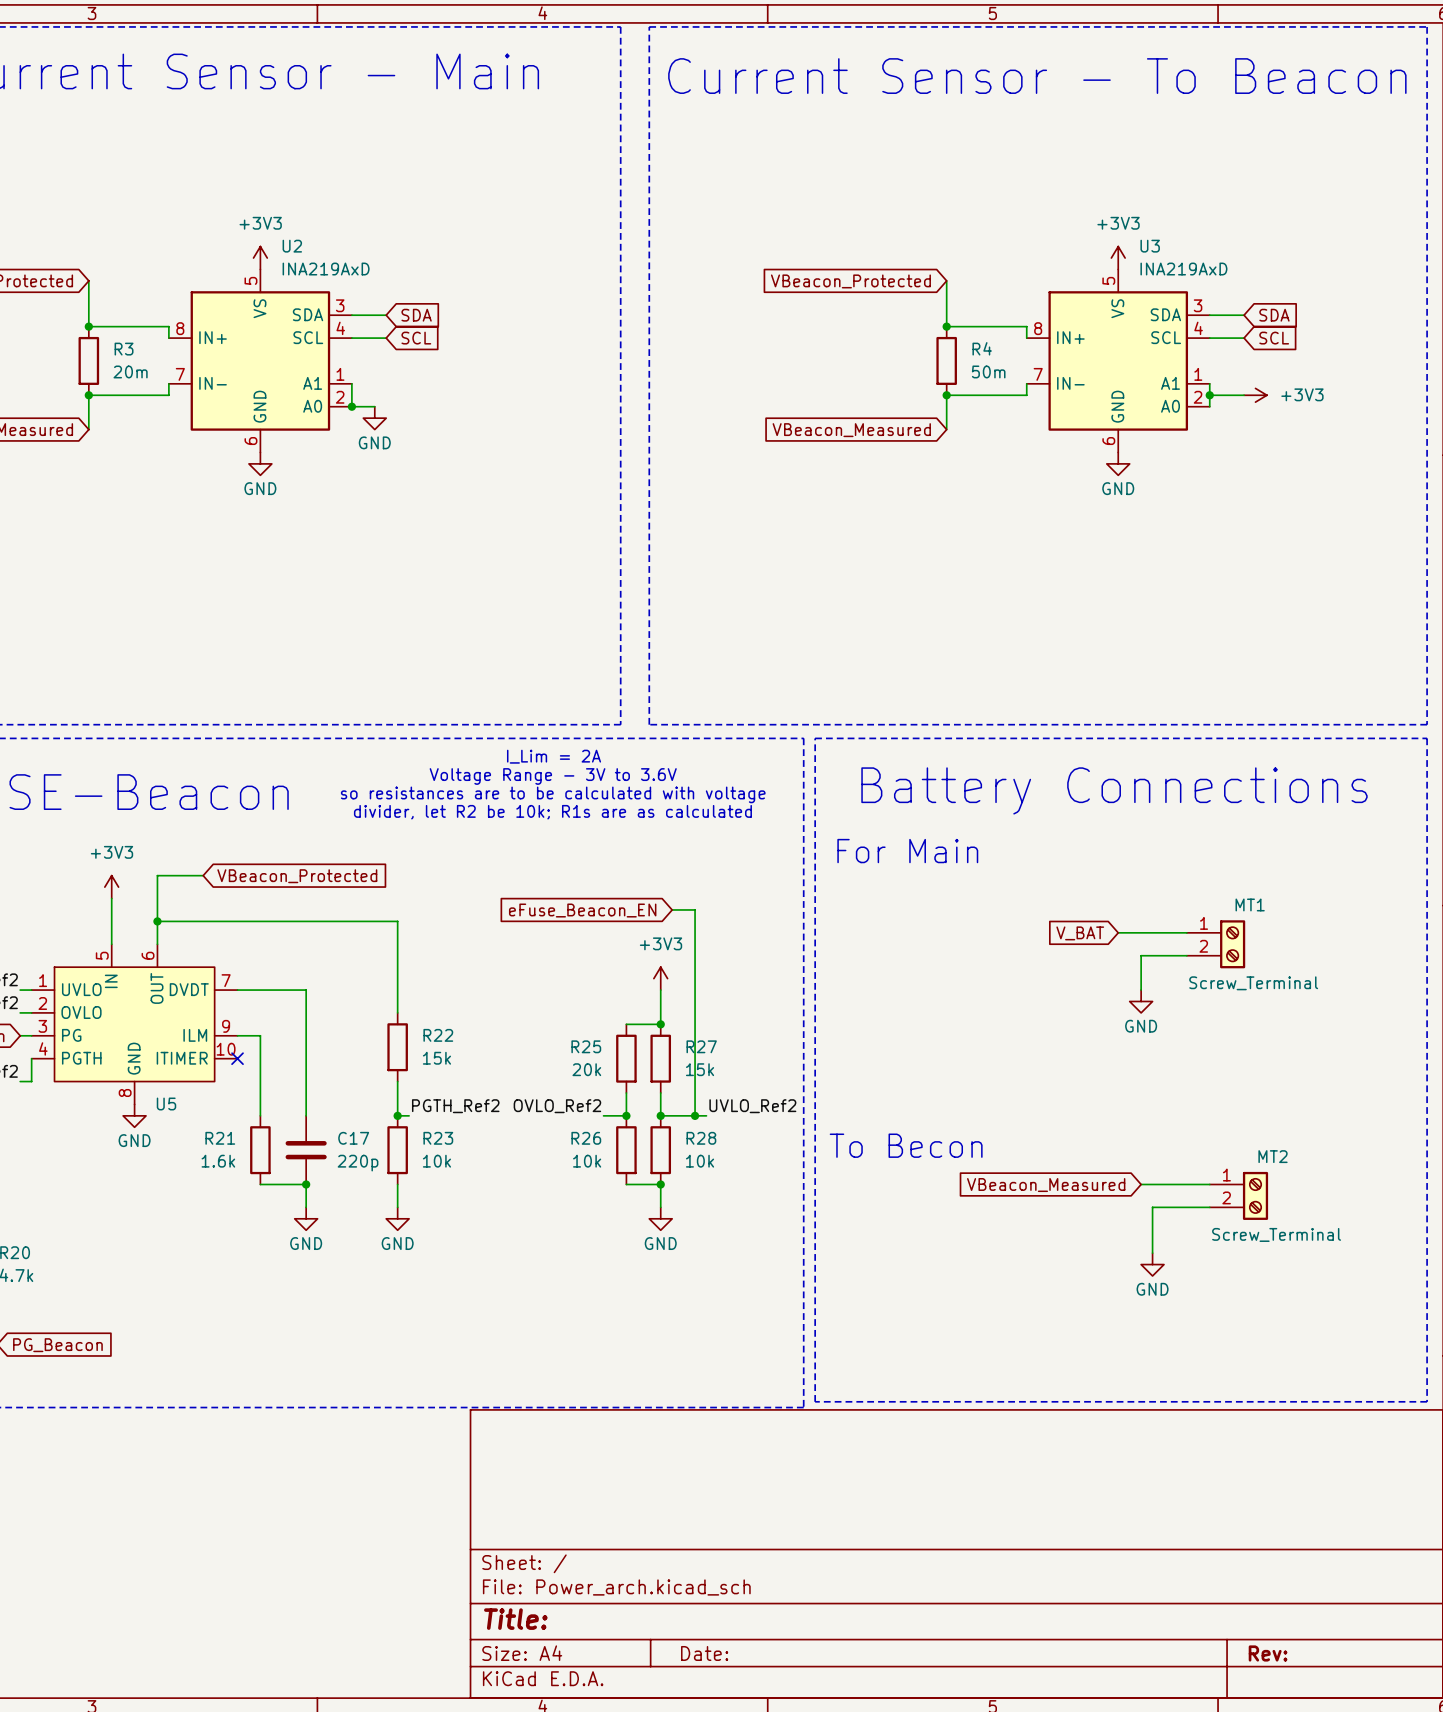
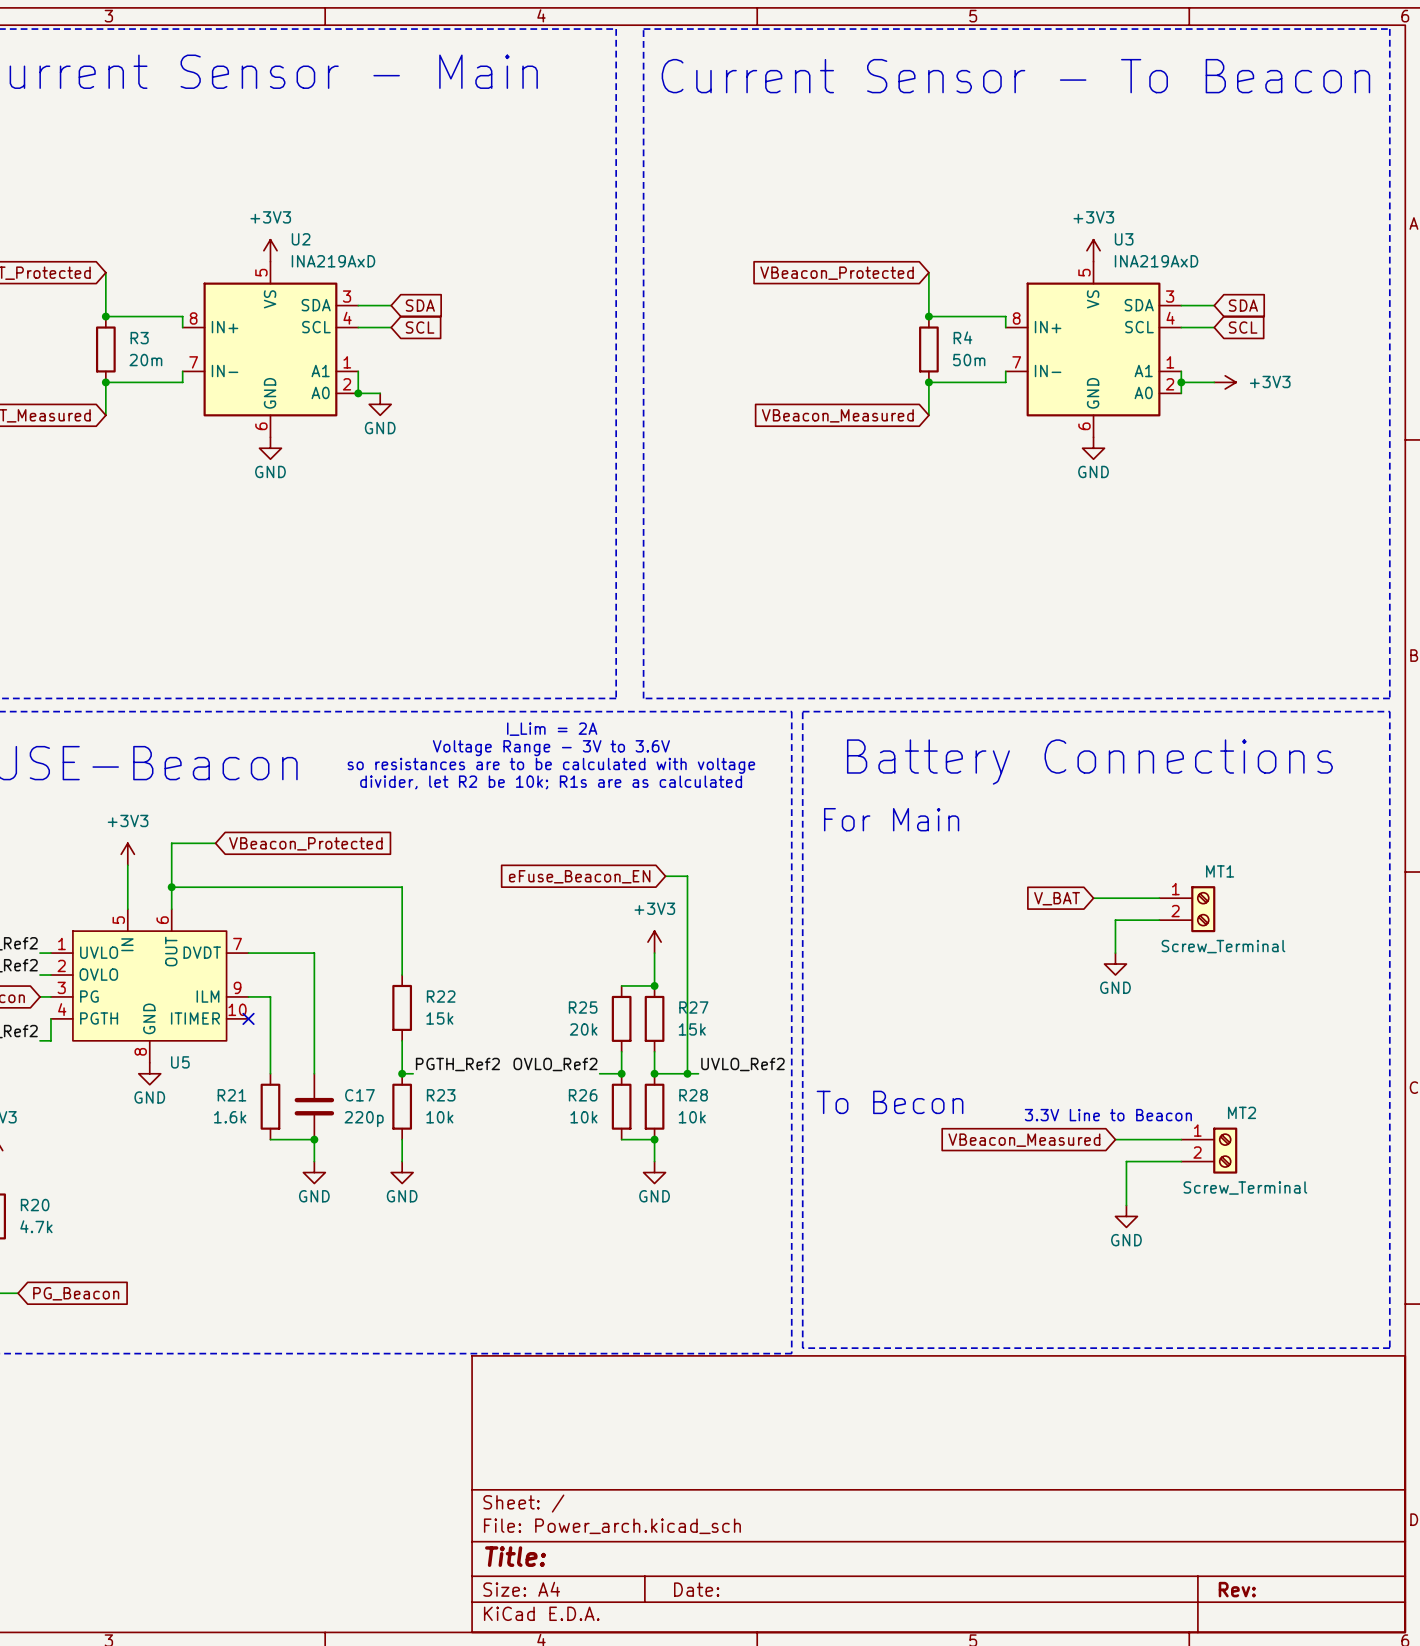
text: none -> 3.3V Line to Beacon (1108, 1115)

